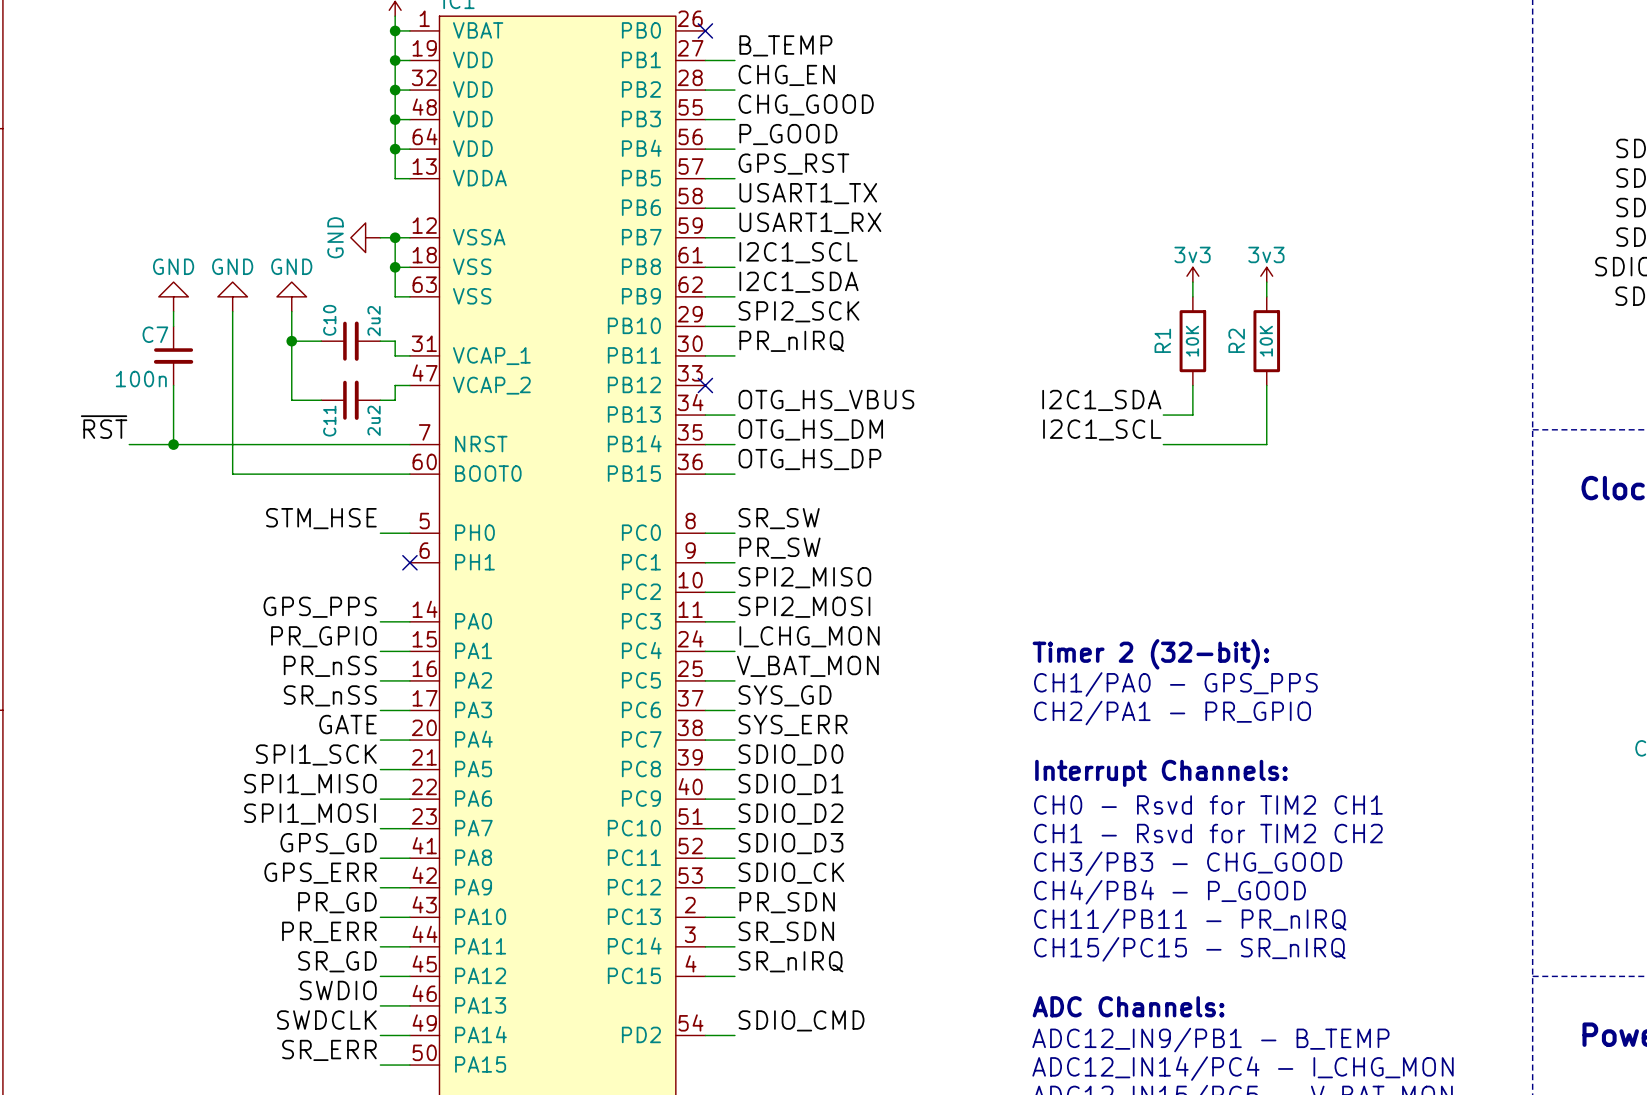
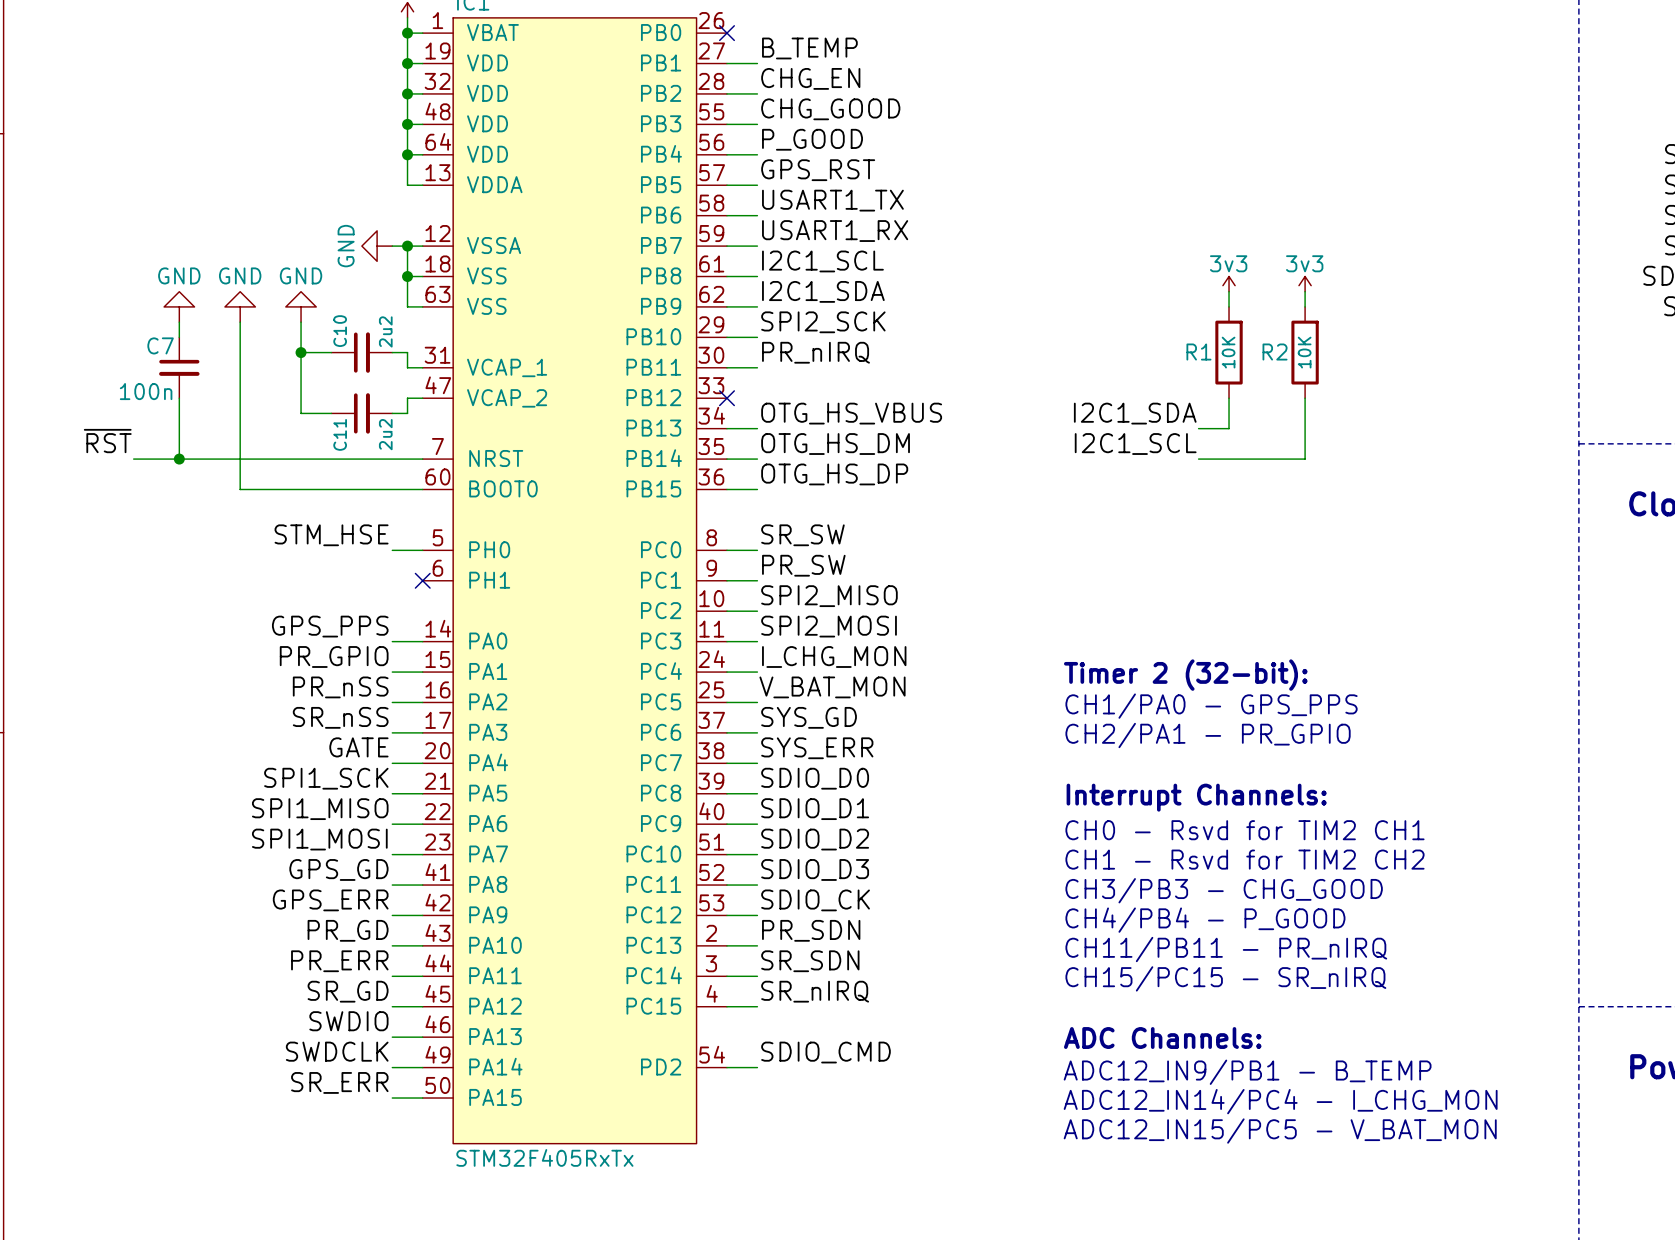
R1 name rotation: 0° (1162, 340) -> 90° clockwise (1198, 352)
R2 name rotation: 0° (1236, 340) -> 90° clockwise (1275, 352)

